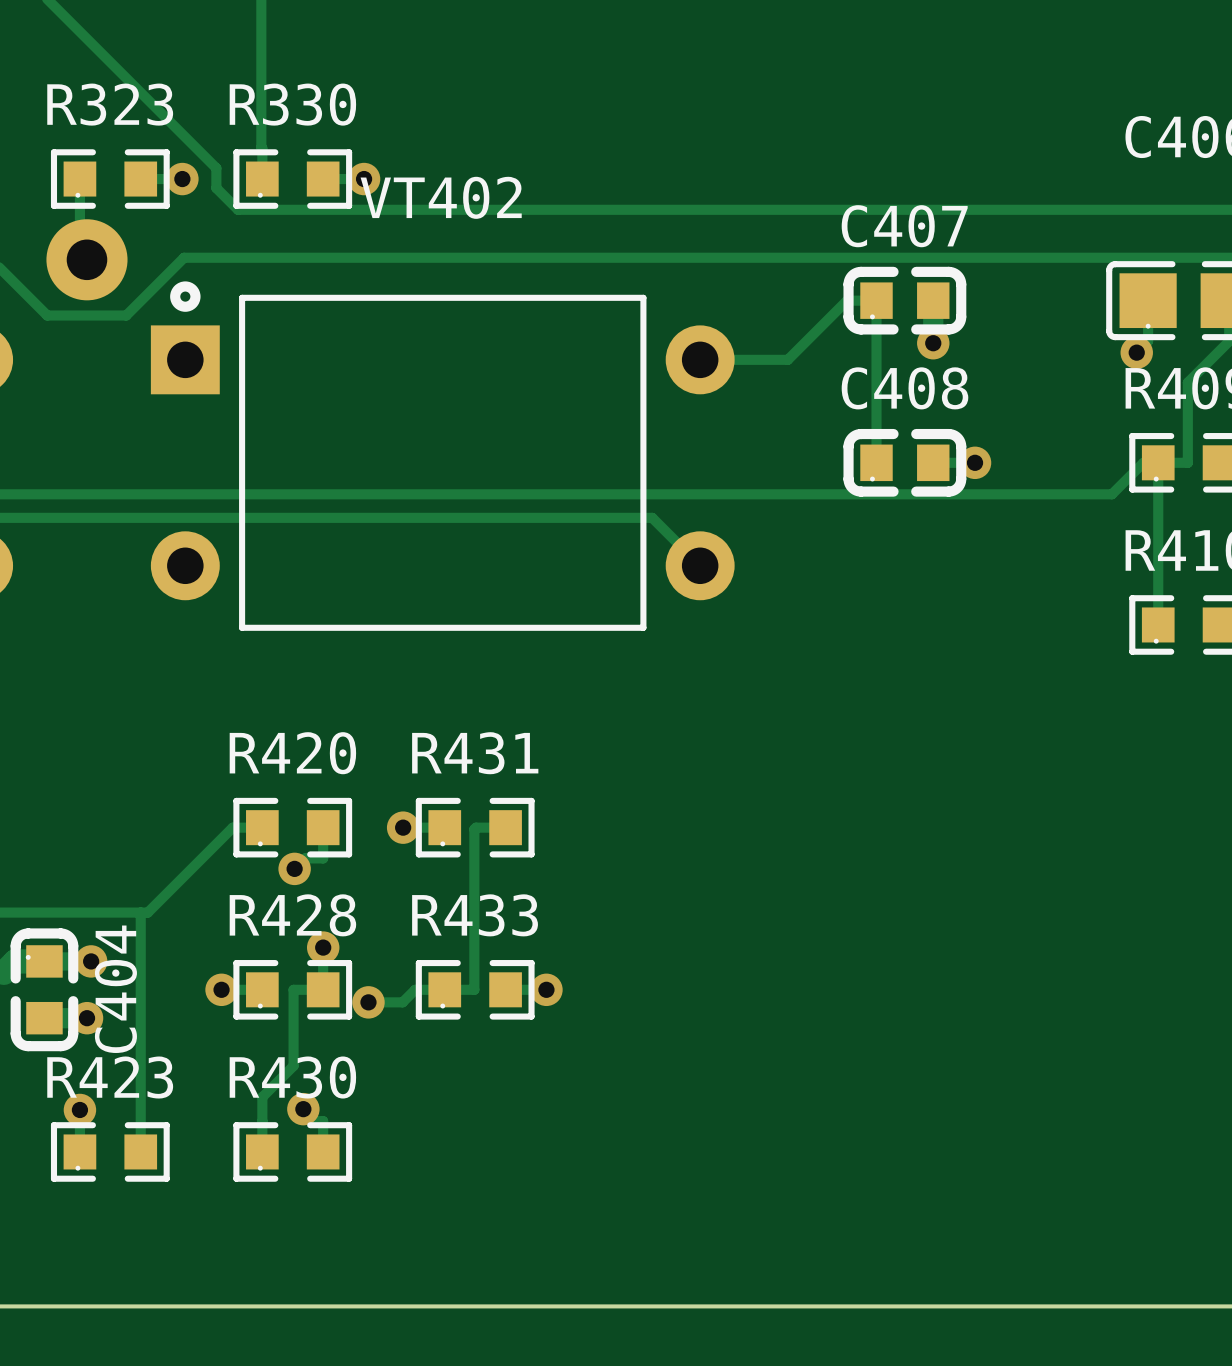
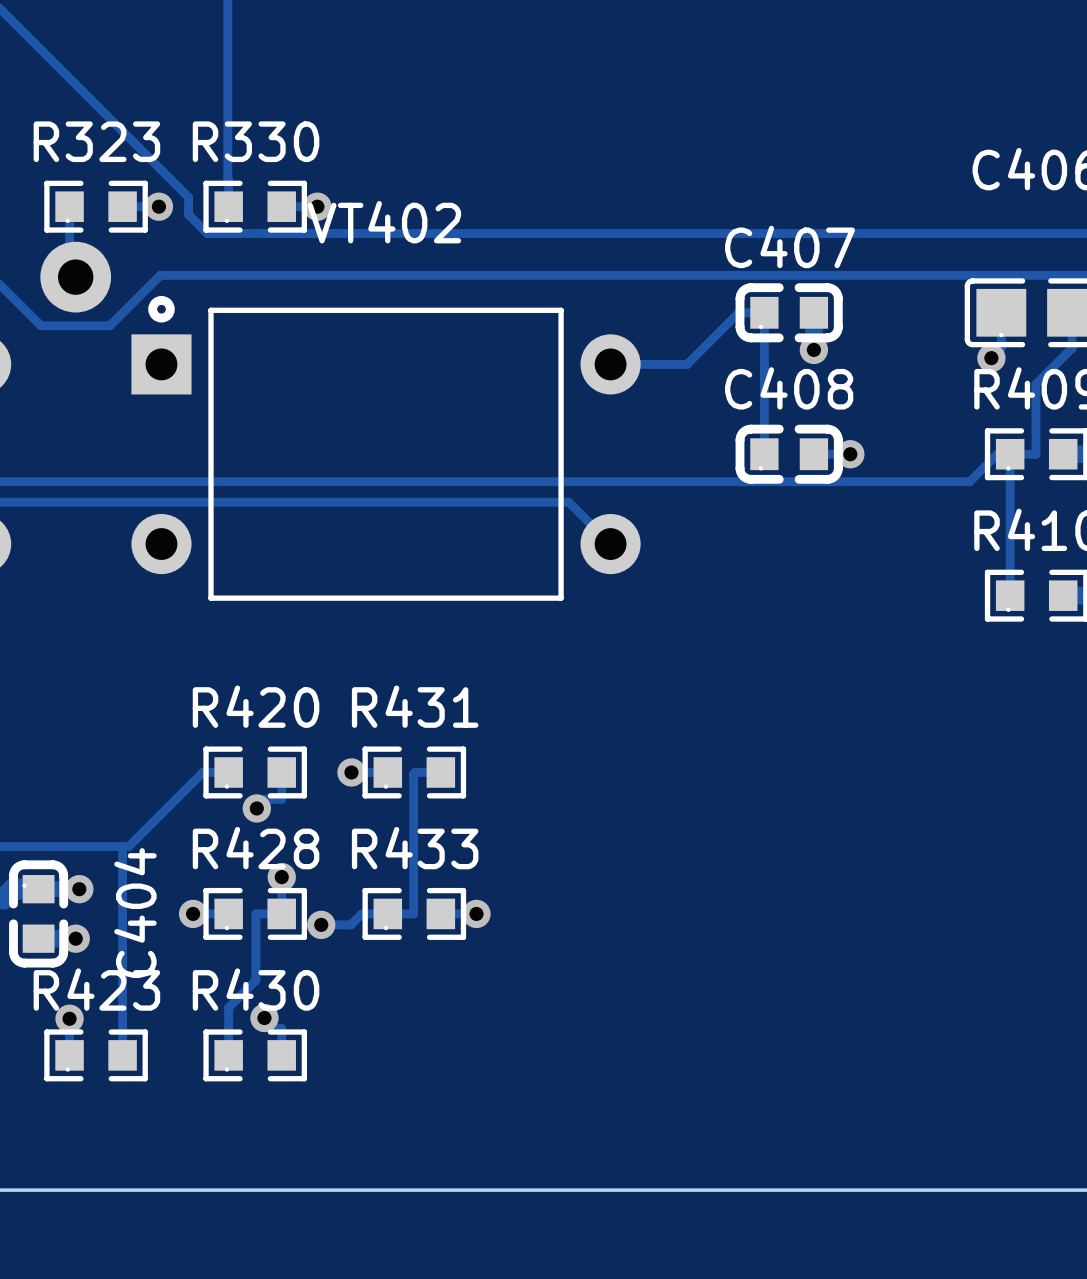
C404 name position: C404 (115, 989) -> C404 (135, 913)

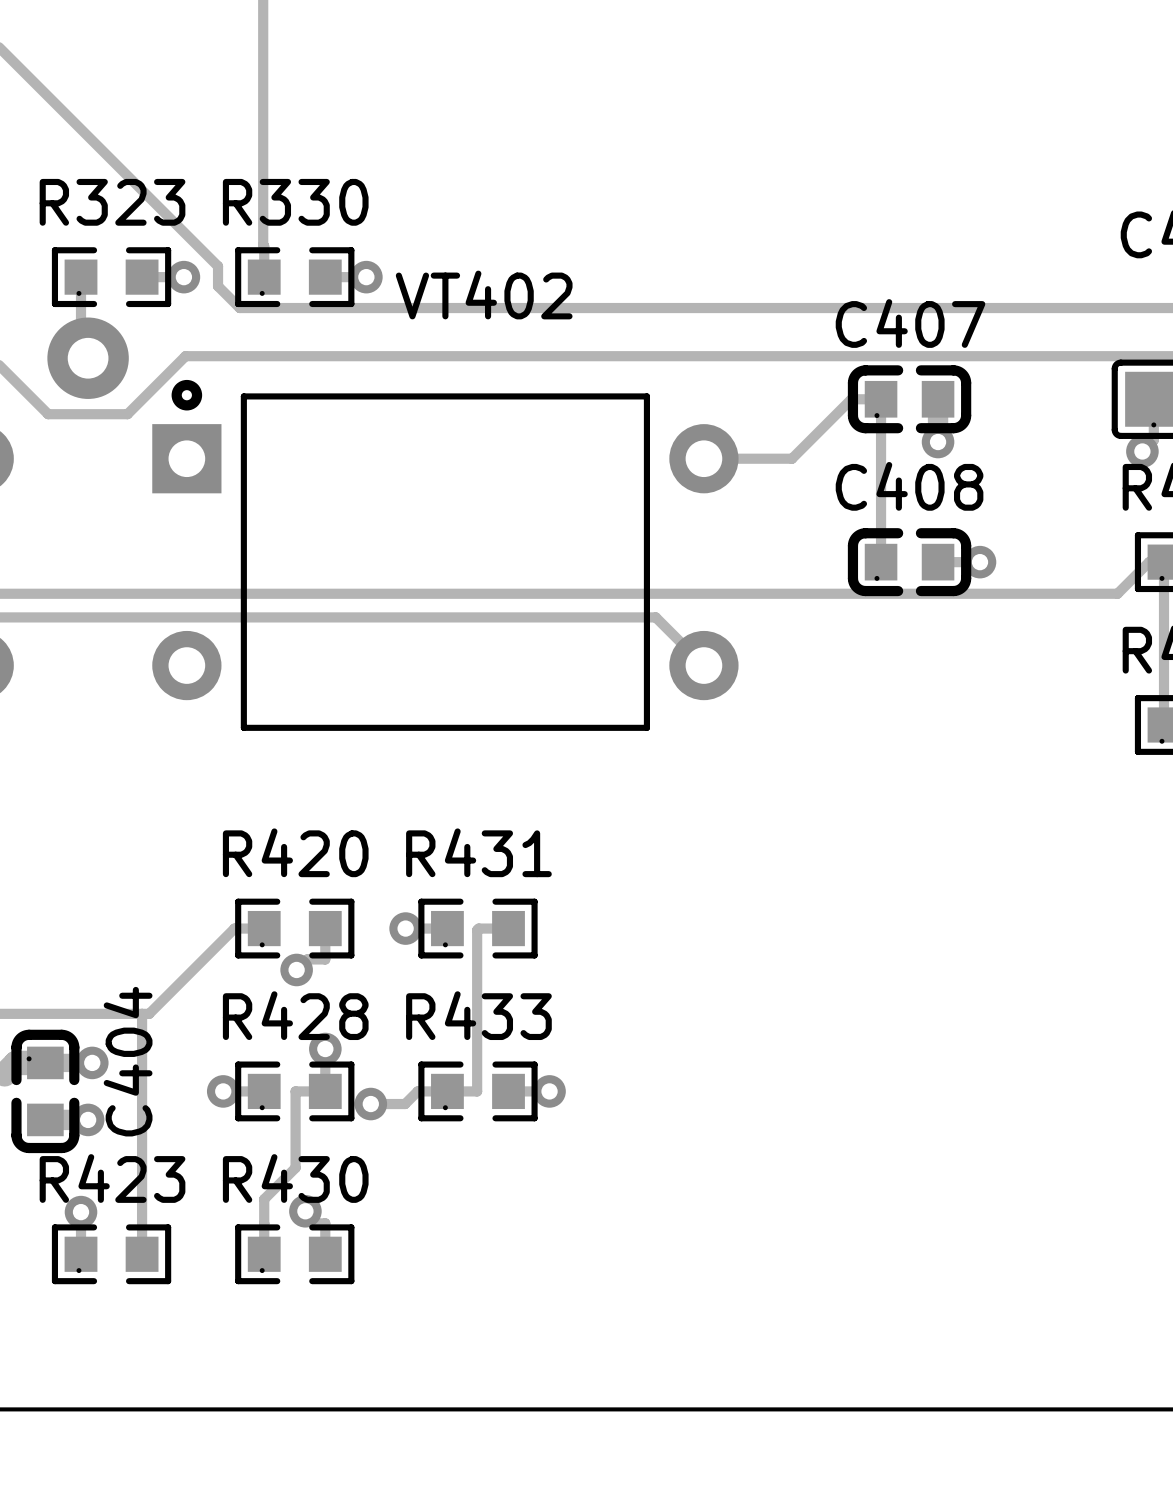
VT402 name position: VT402 (384, 222) -> VT402 (484, 295)
C404 name position: C404 (135, 913) -> C404 (128, 1061)

